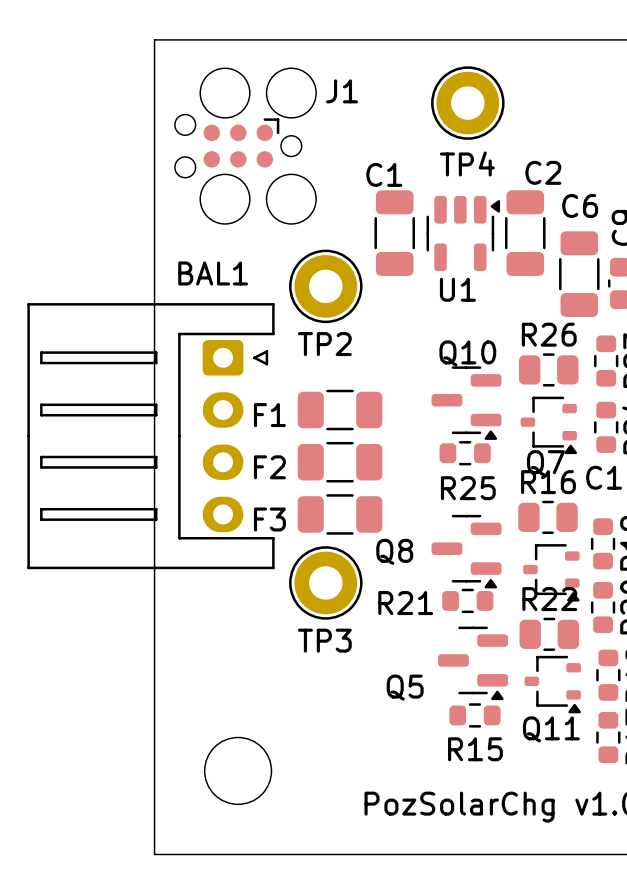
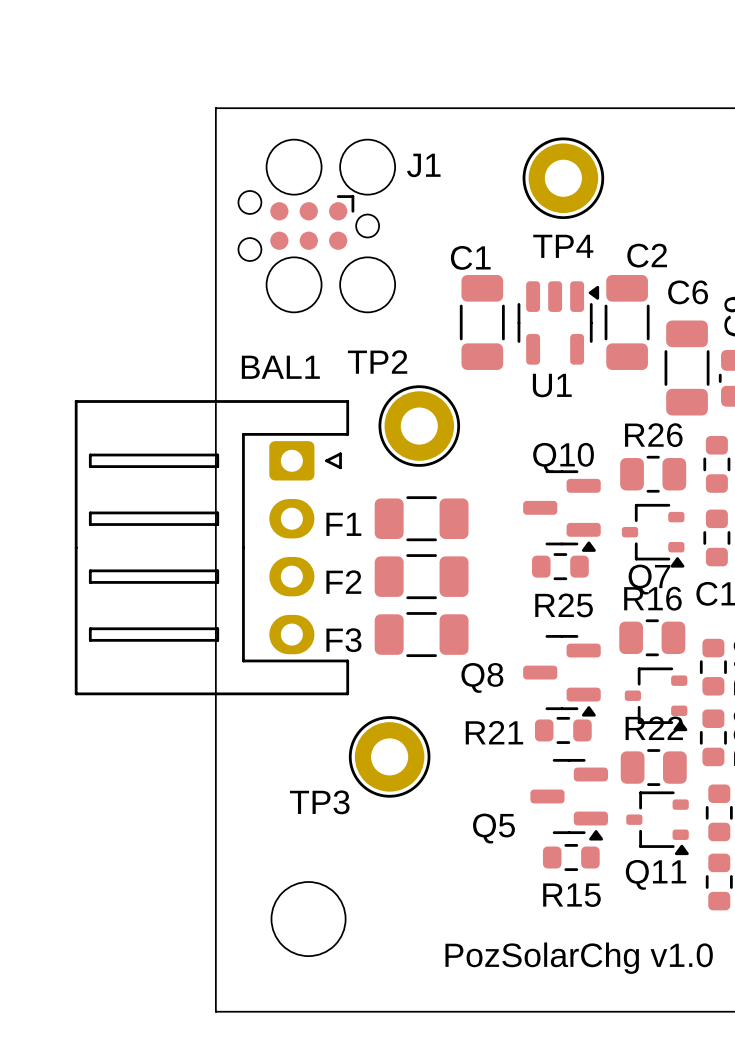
TP2 position: (325, 286) -> (419, 426)
TP2 name position: TP2 (324, 344) -> TP2 (377, 362)
TP3 position: (325, 582) -> (389, 756)
TP3 name position: TP3 (324, 640) -> TP3 (319, 802)

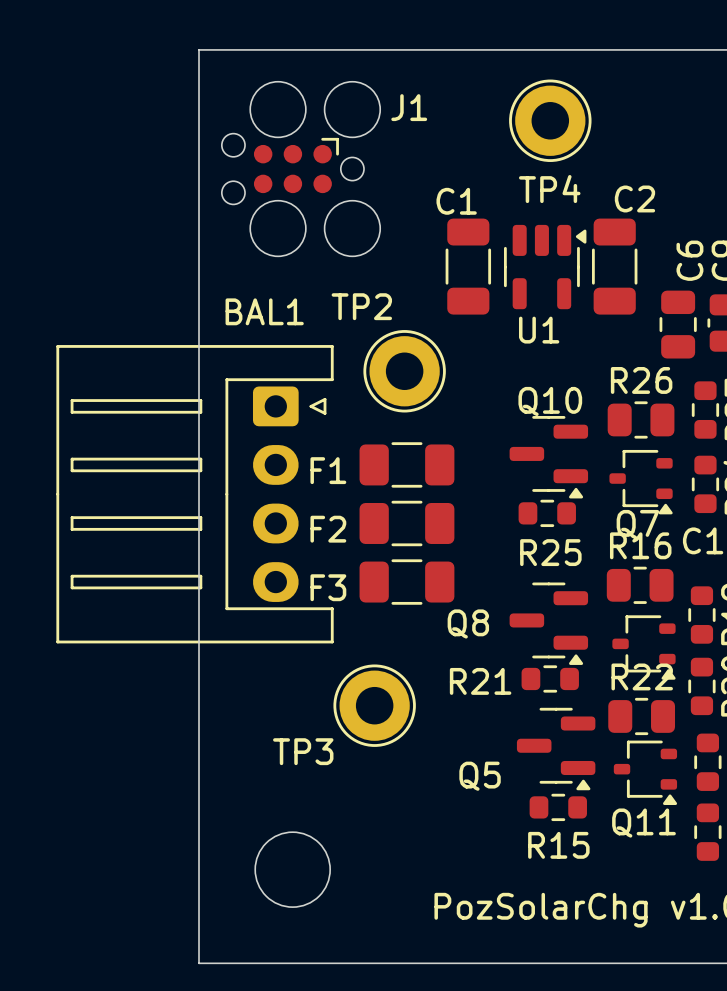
C6 footprint: [664, 320, 710, 416] -> [659, 290, 697, 359]

